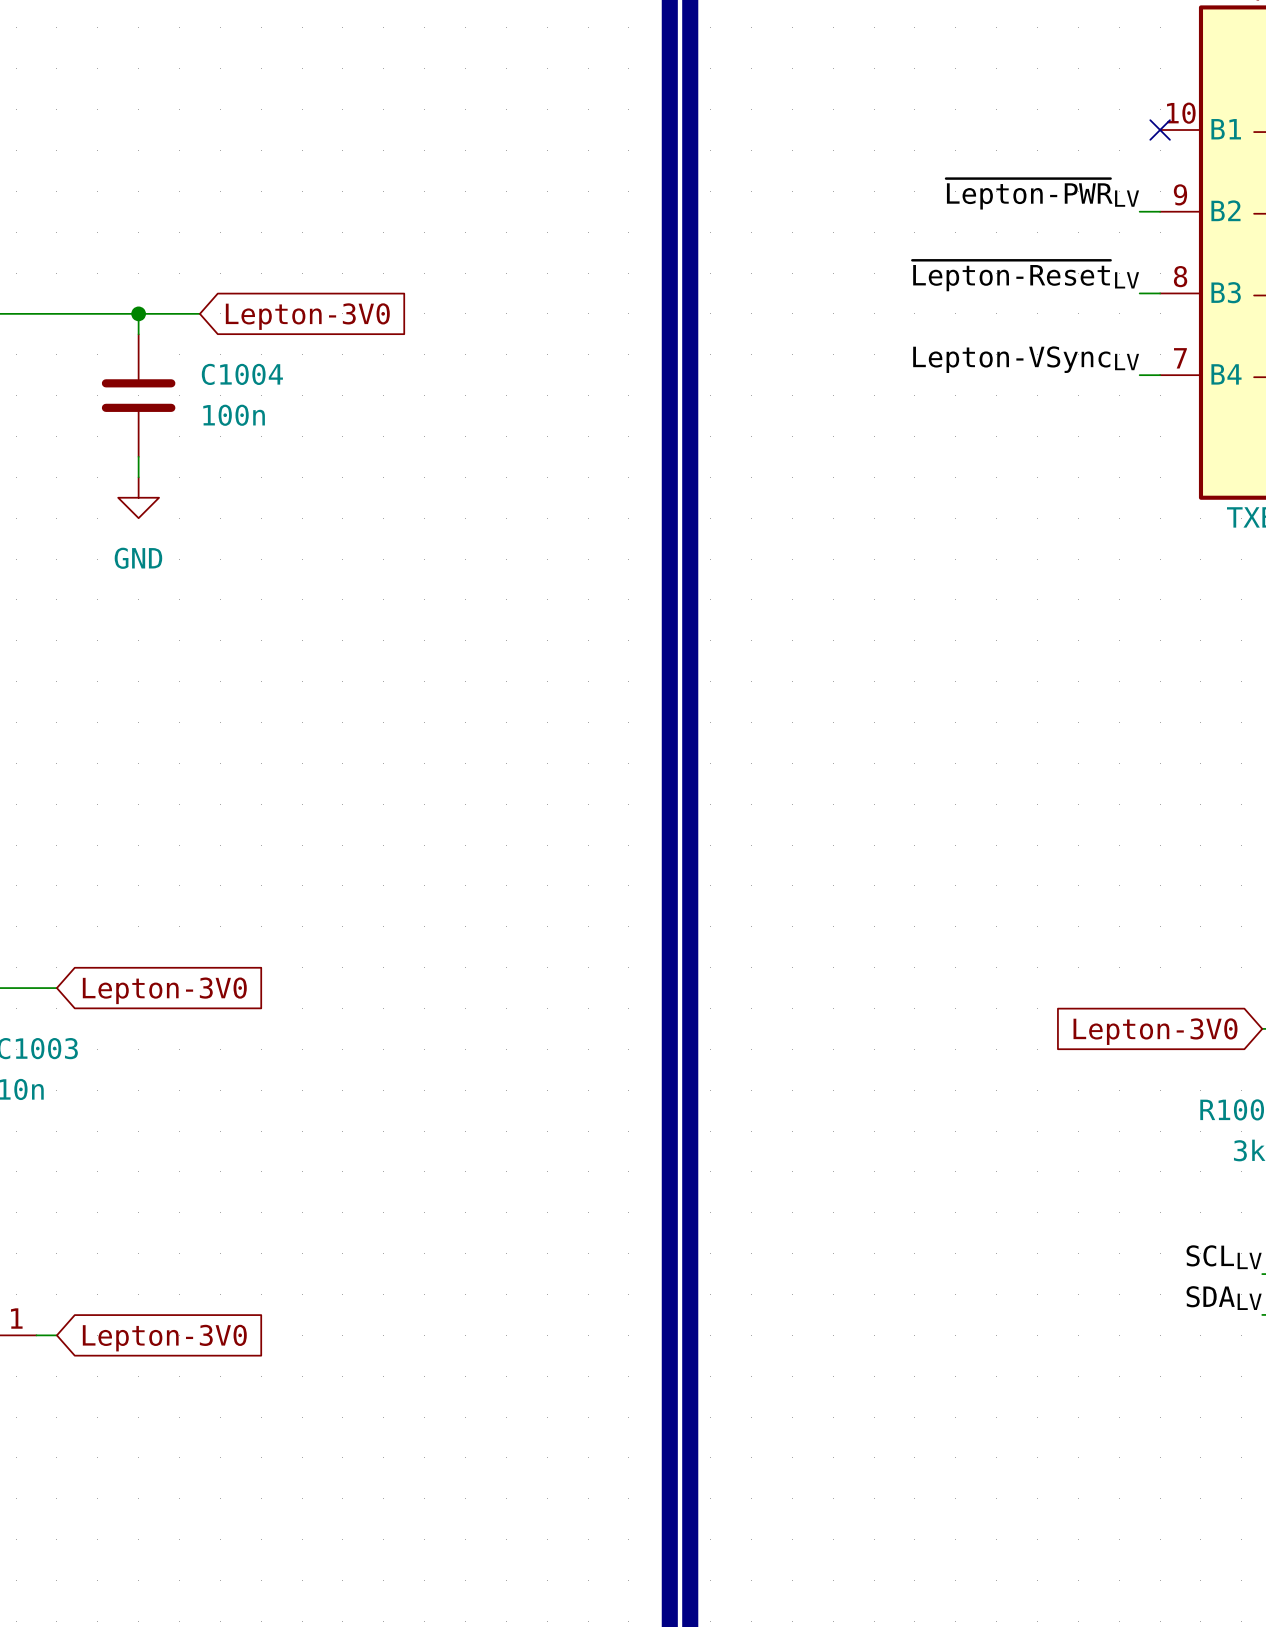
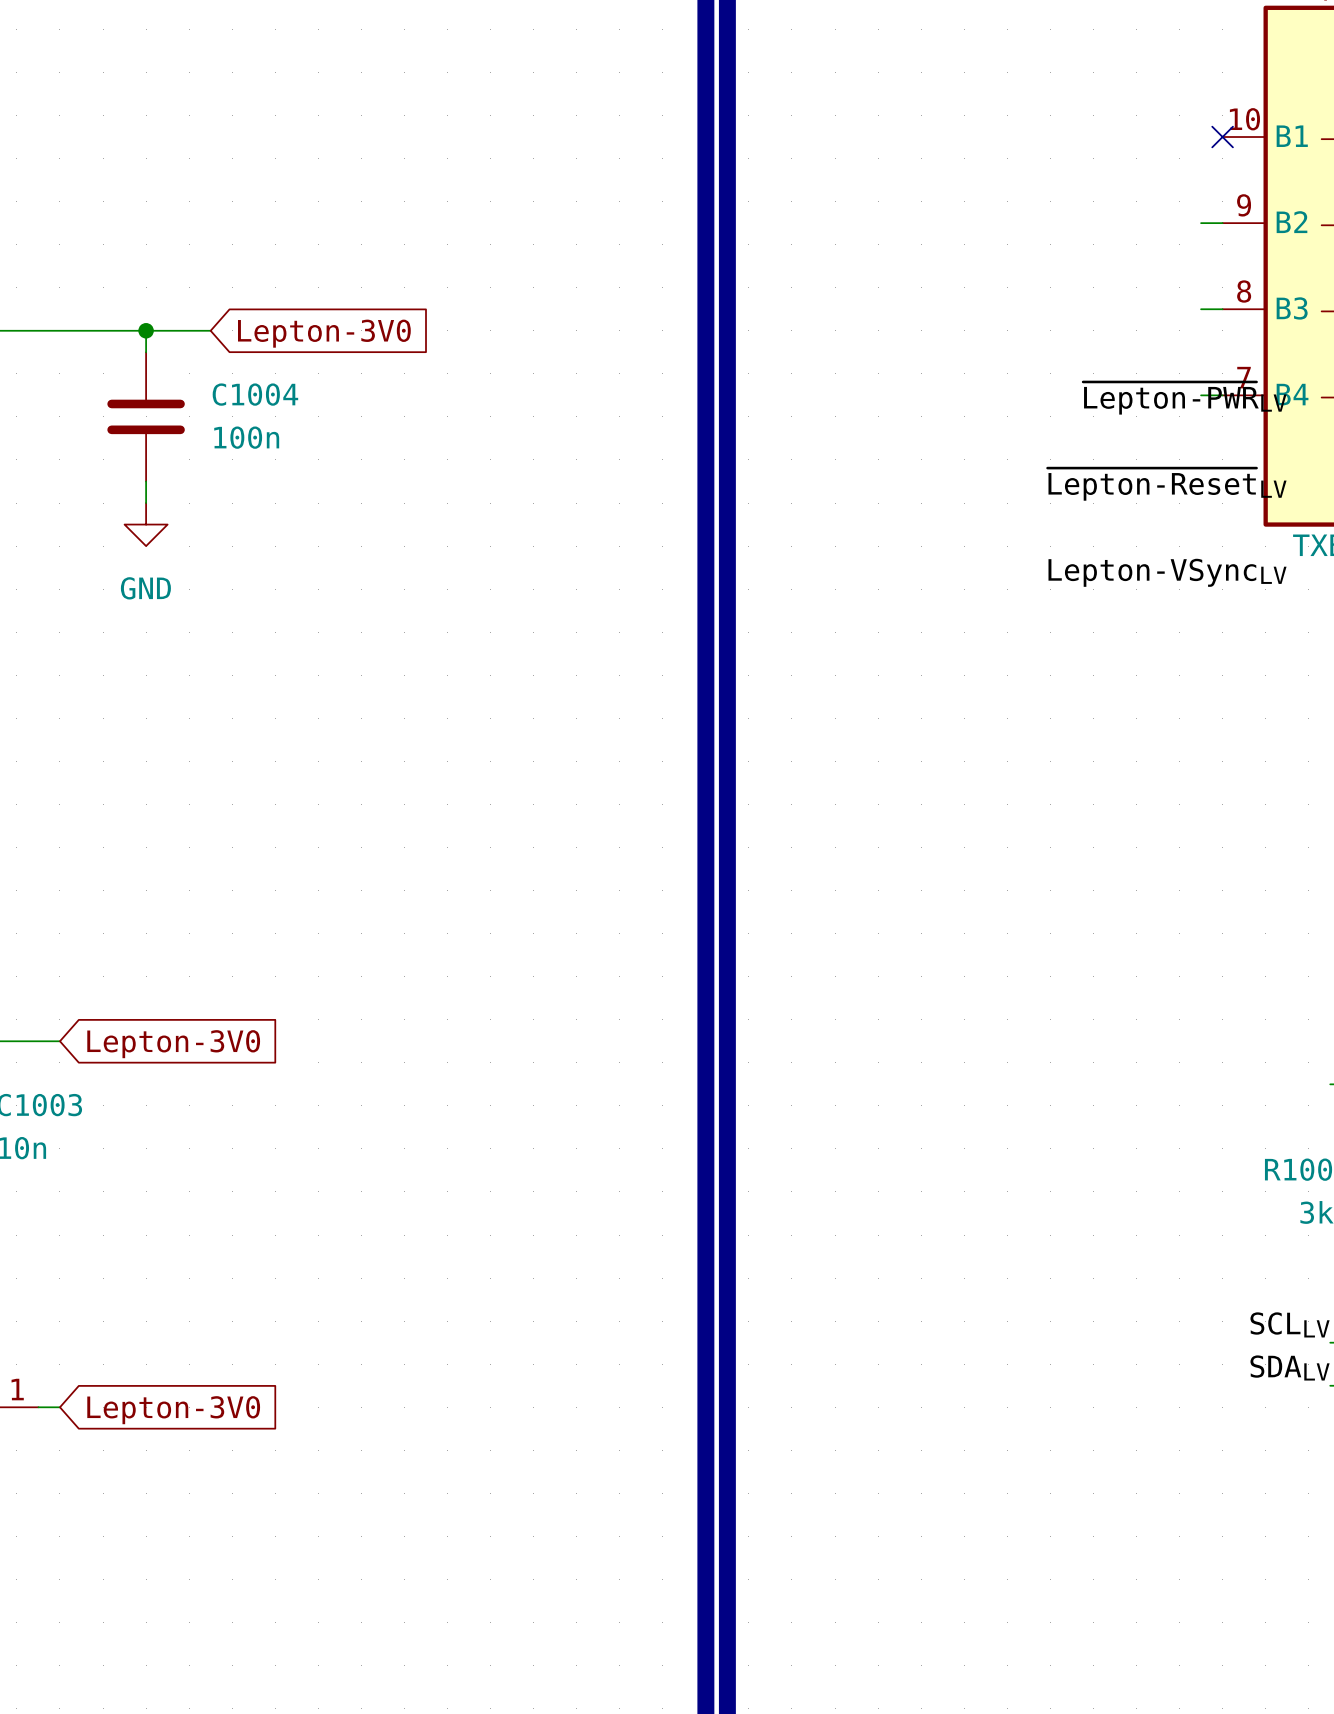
label position: ~{Lepton-PWR}LV (1042, 194) -> ~{Lepton-PWR}LV (1184, 398)
label position: ~{Lepton-Reset}LV (1025, 275) -> ~{Lepton-Reset}LV (1167, 484)
label position: Lepton-VSyncLV (1026, 359) -> Lepton-VSyncLV (1167, 572)
global label: Lepton-3V0 (1155, 1031) -> none

